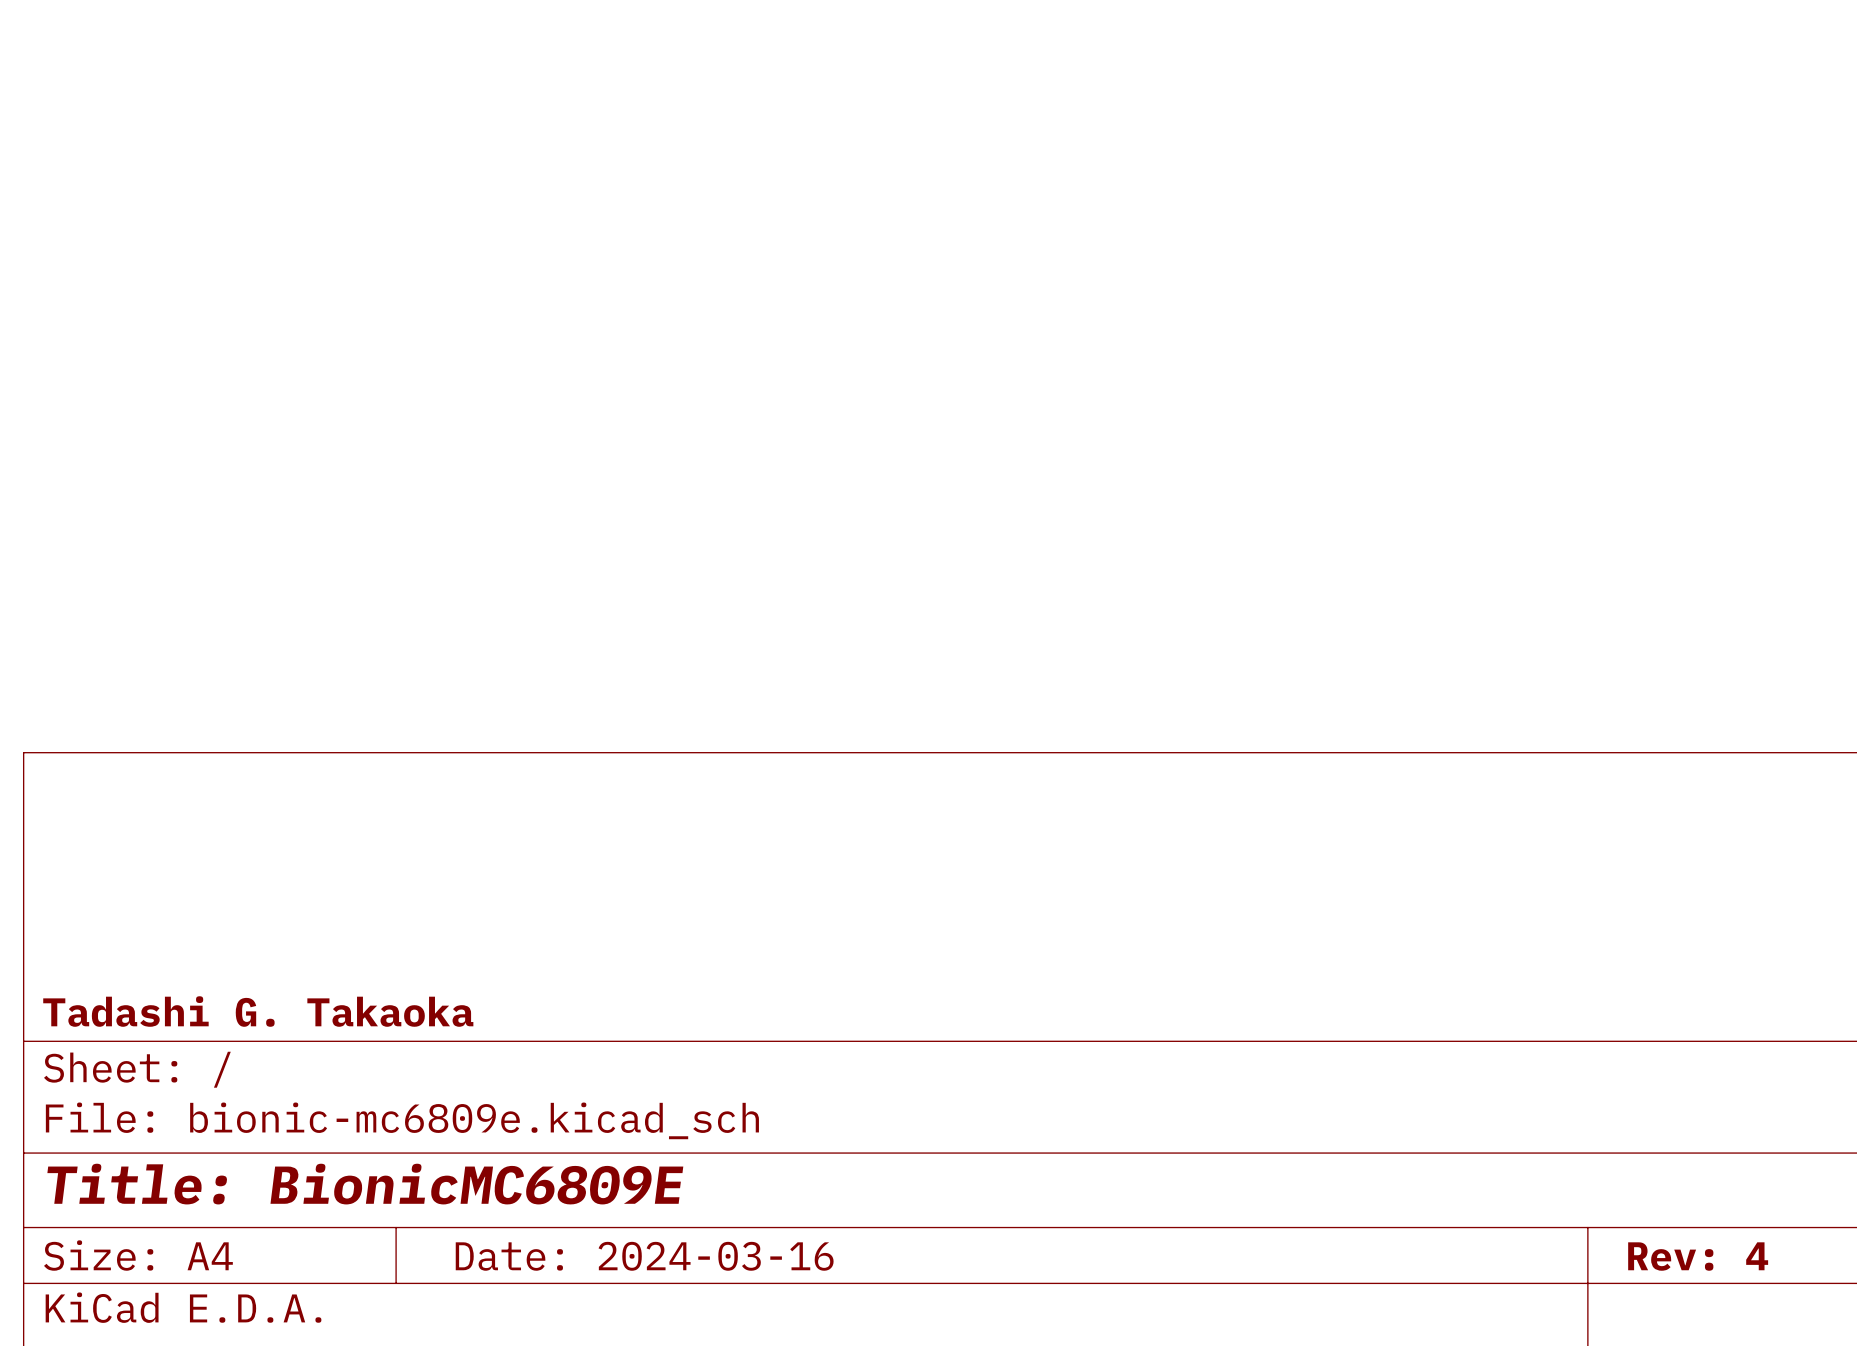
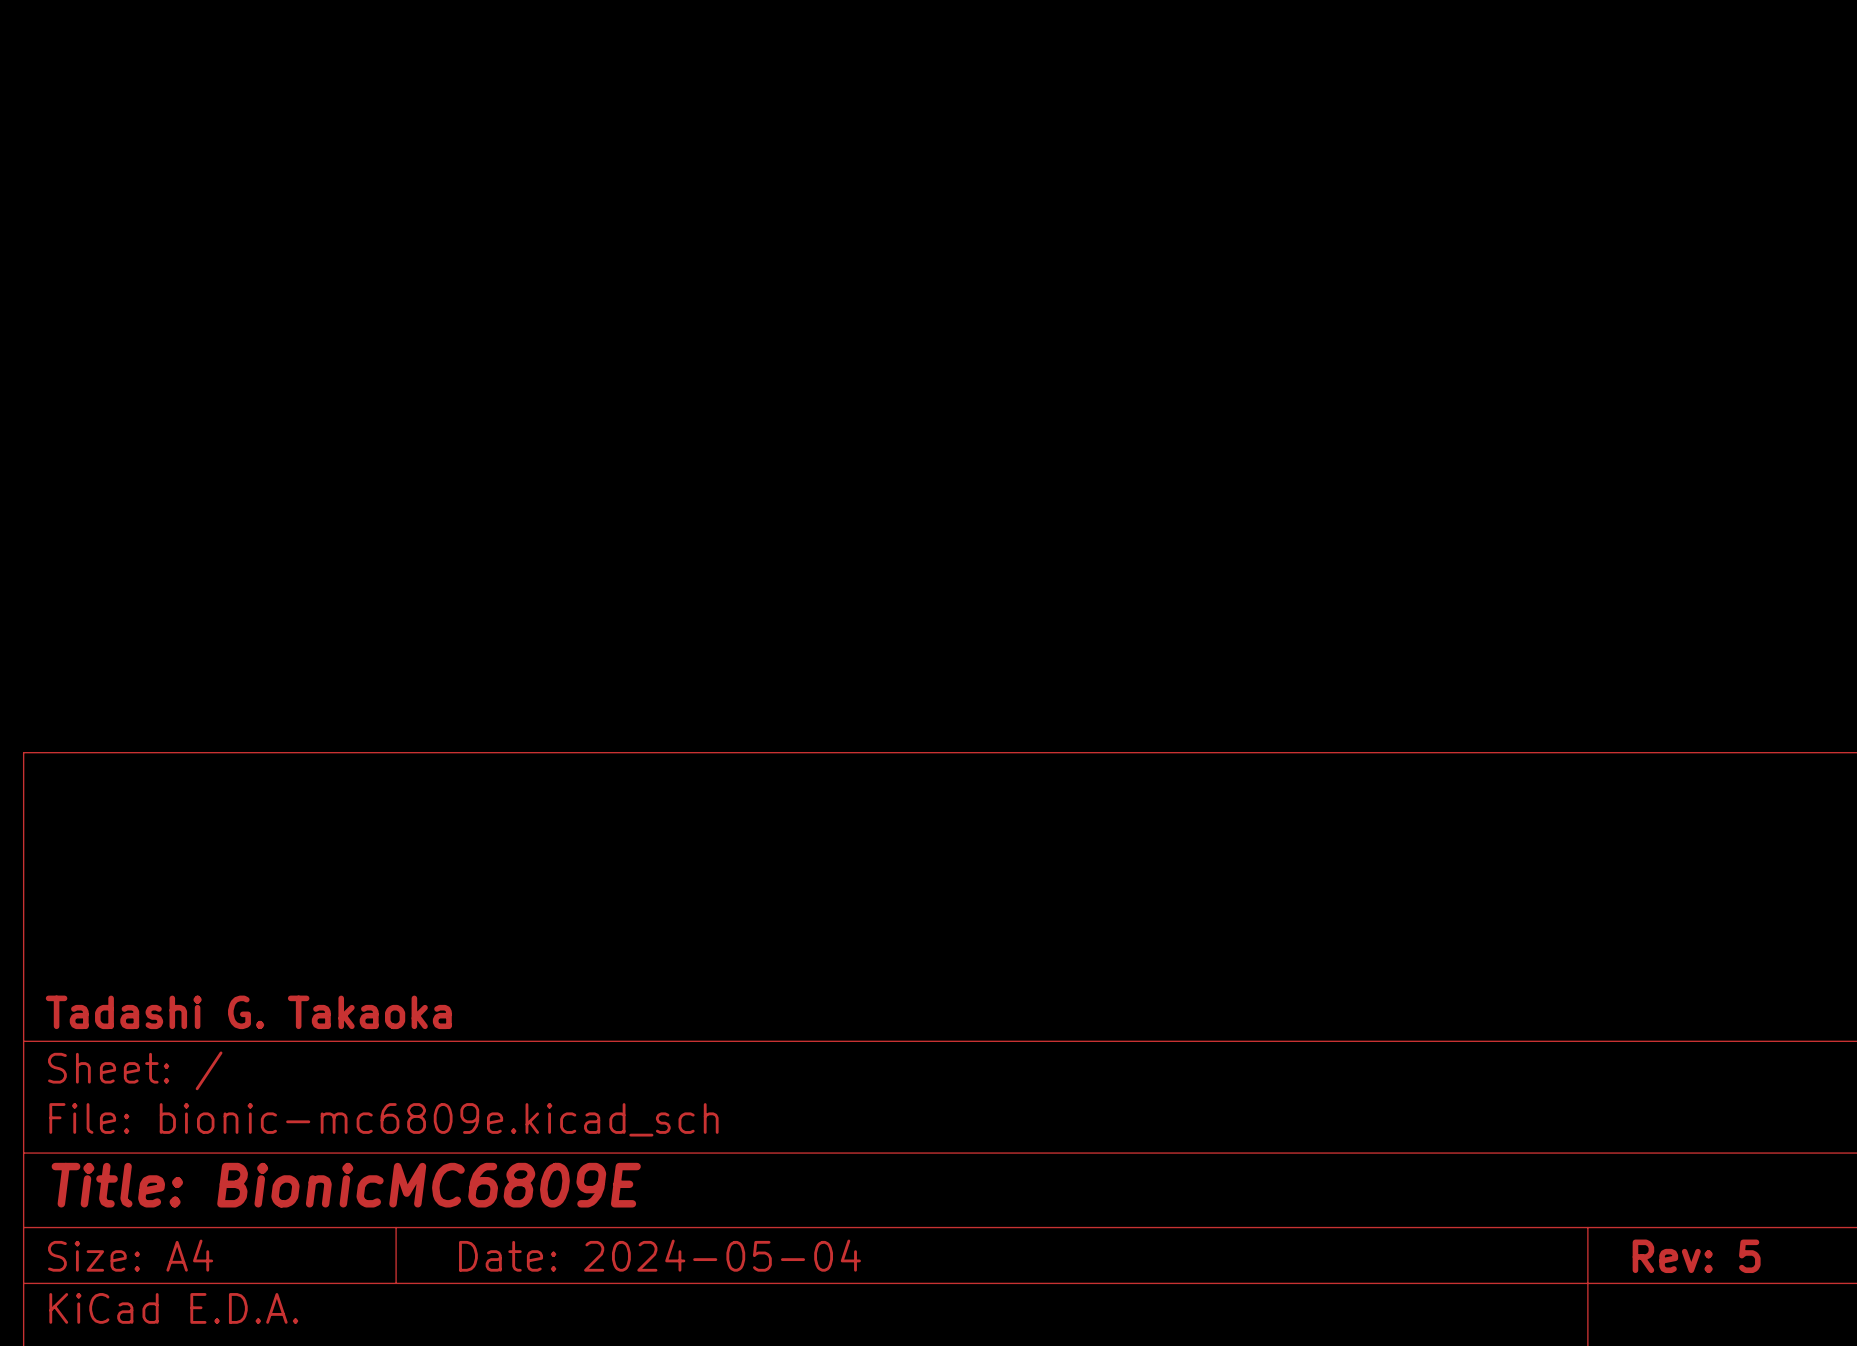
title block: Date: 2024-03-16 (644, 1256) -> Date: 2024-05-04 (659, 1255)
title block: Rev: 4 (1698, 1256) -> Rev: 5 (1696, 1256)

